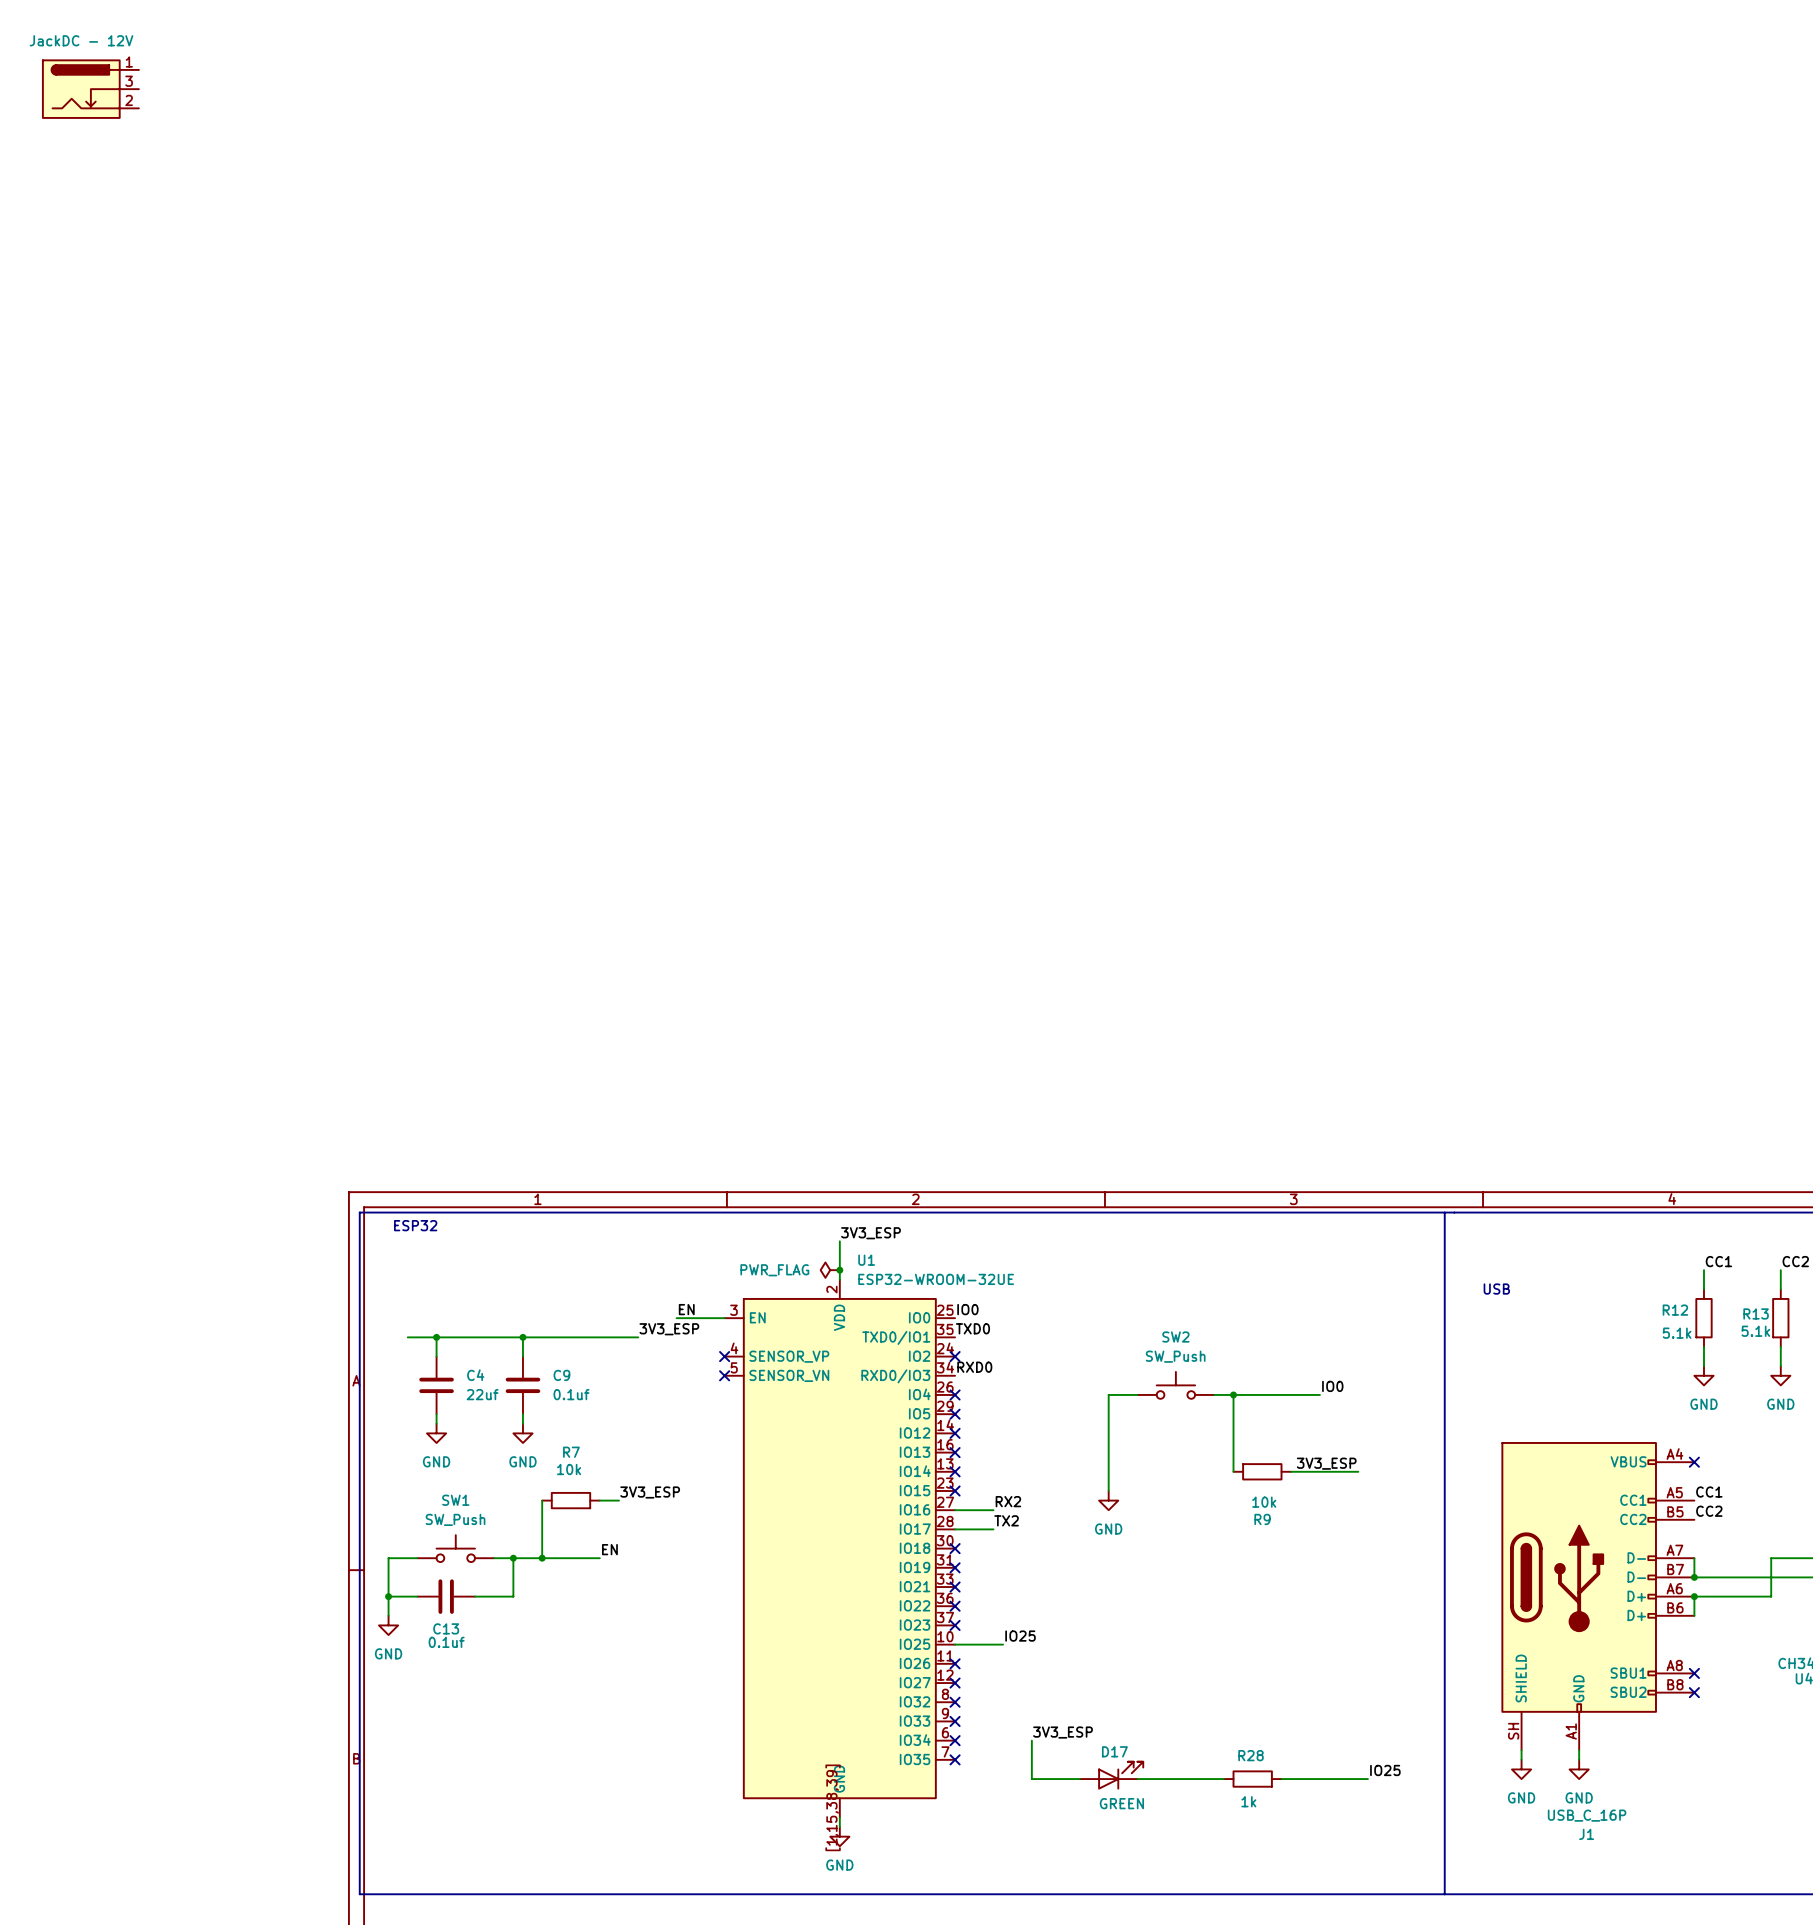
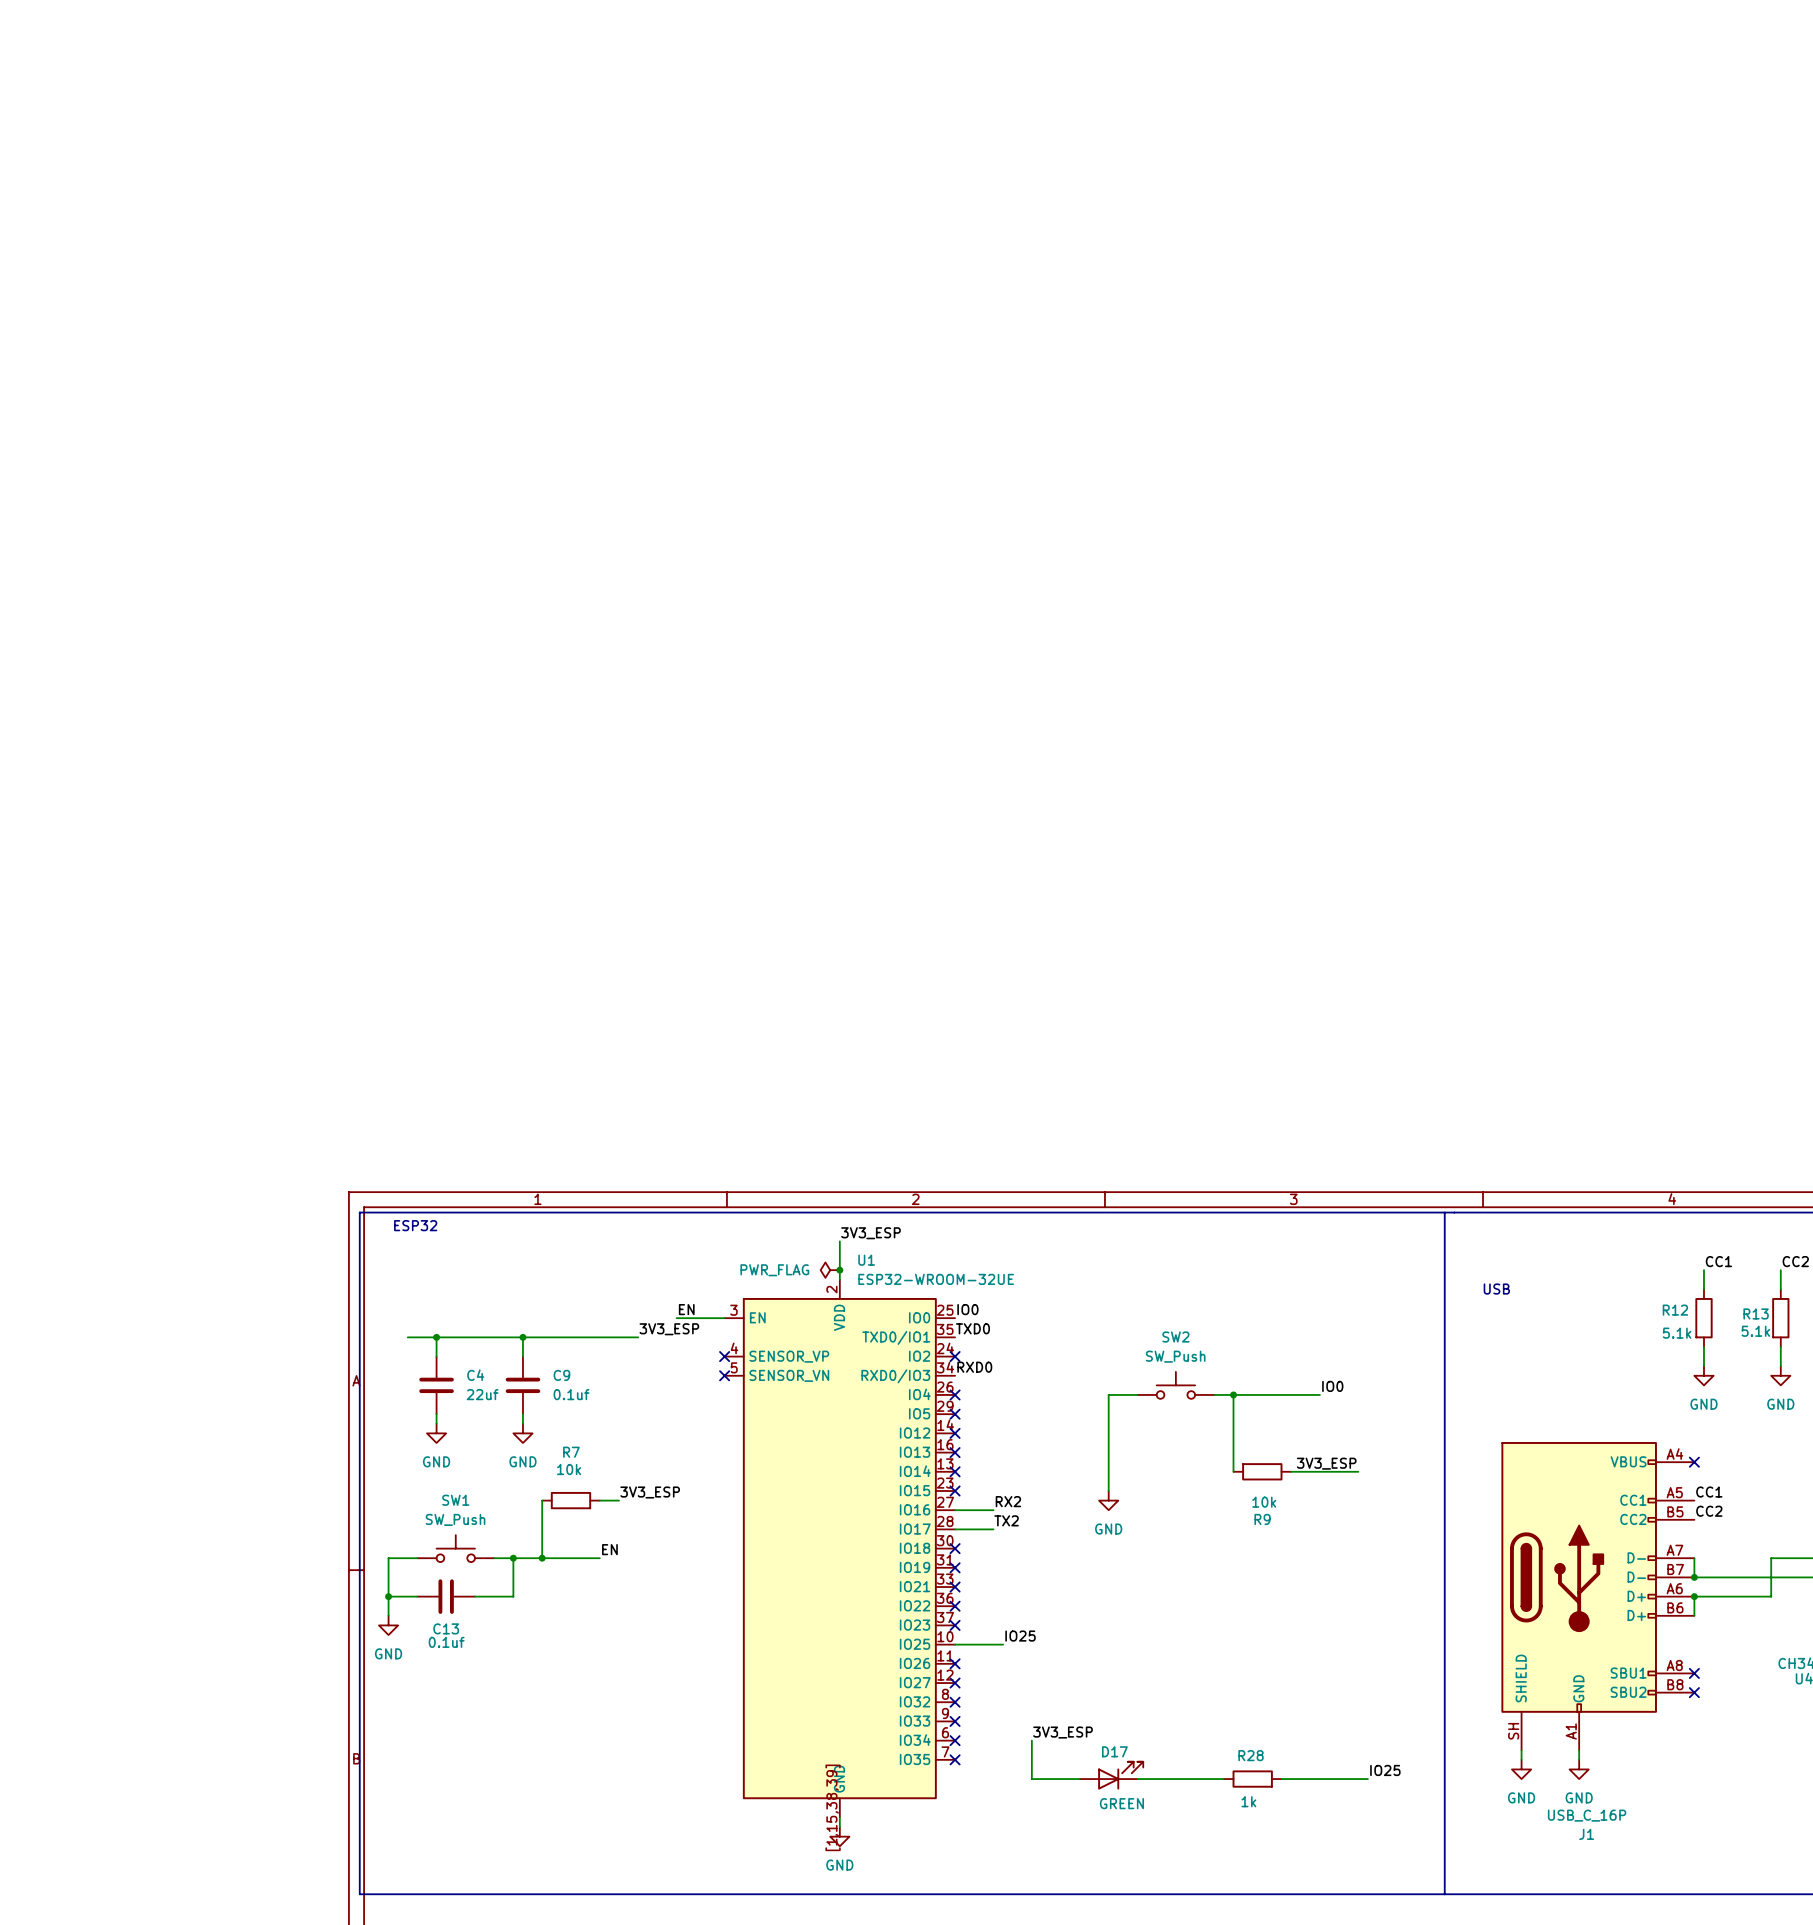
part: JackDC - 12V (90, 89) -> none

